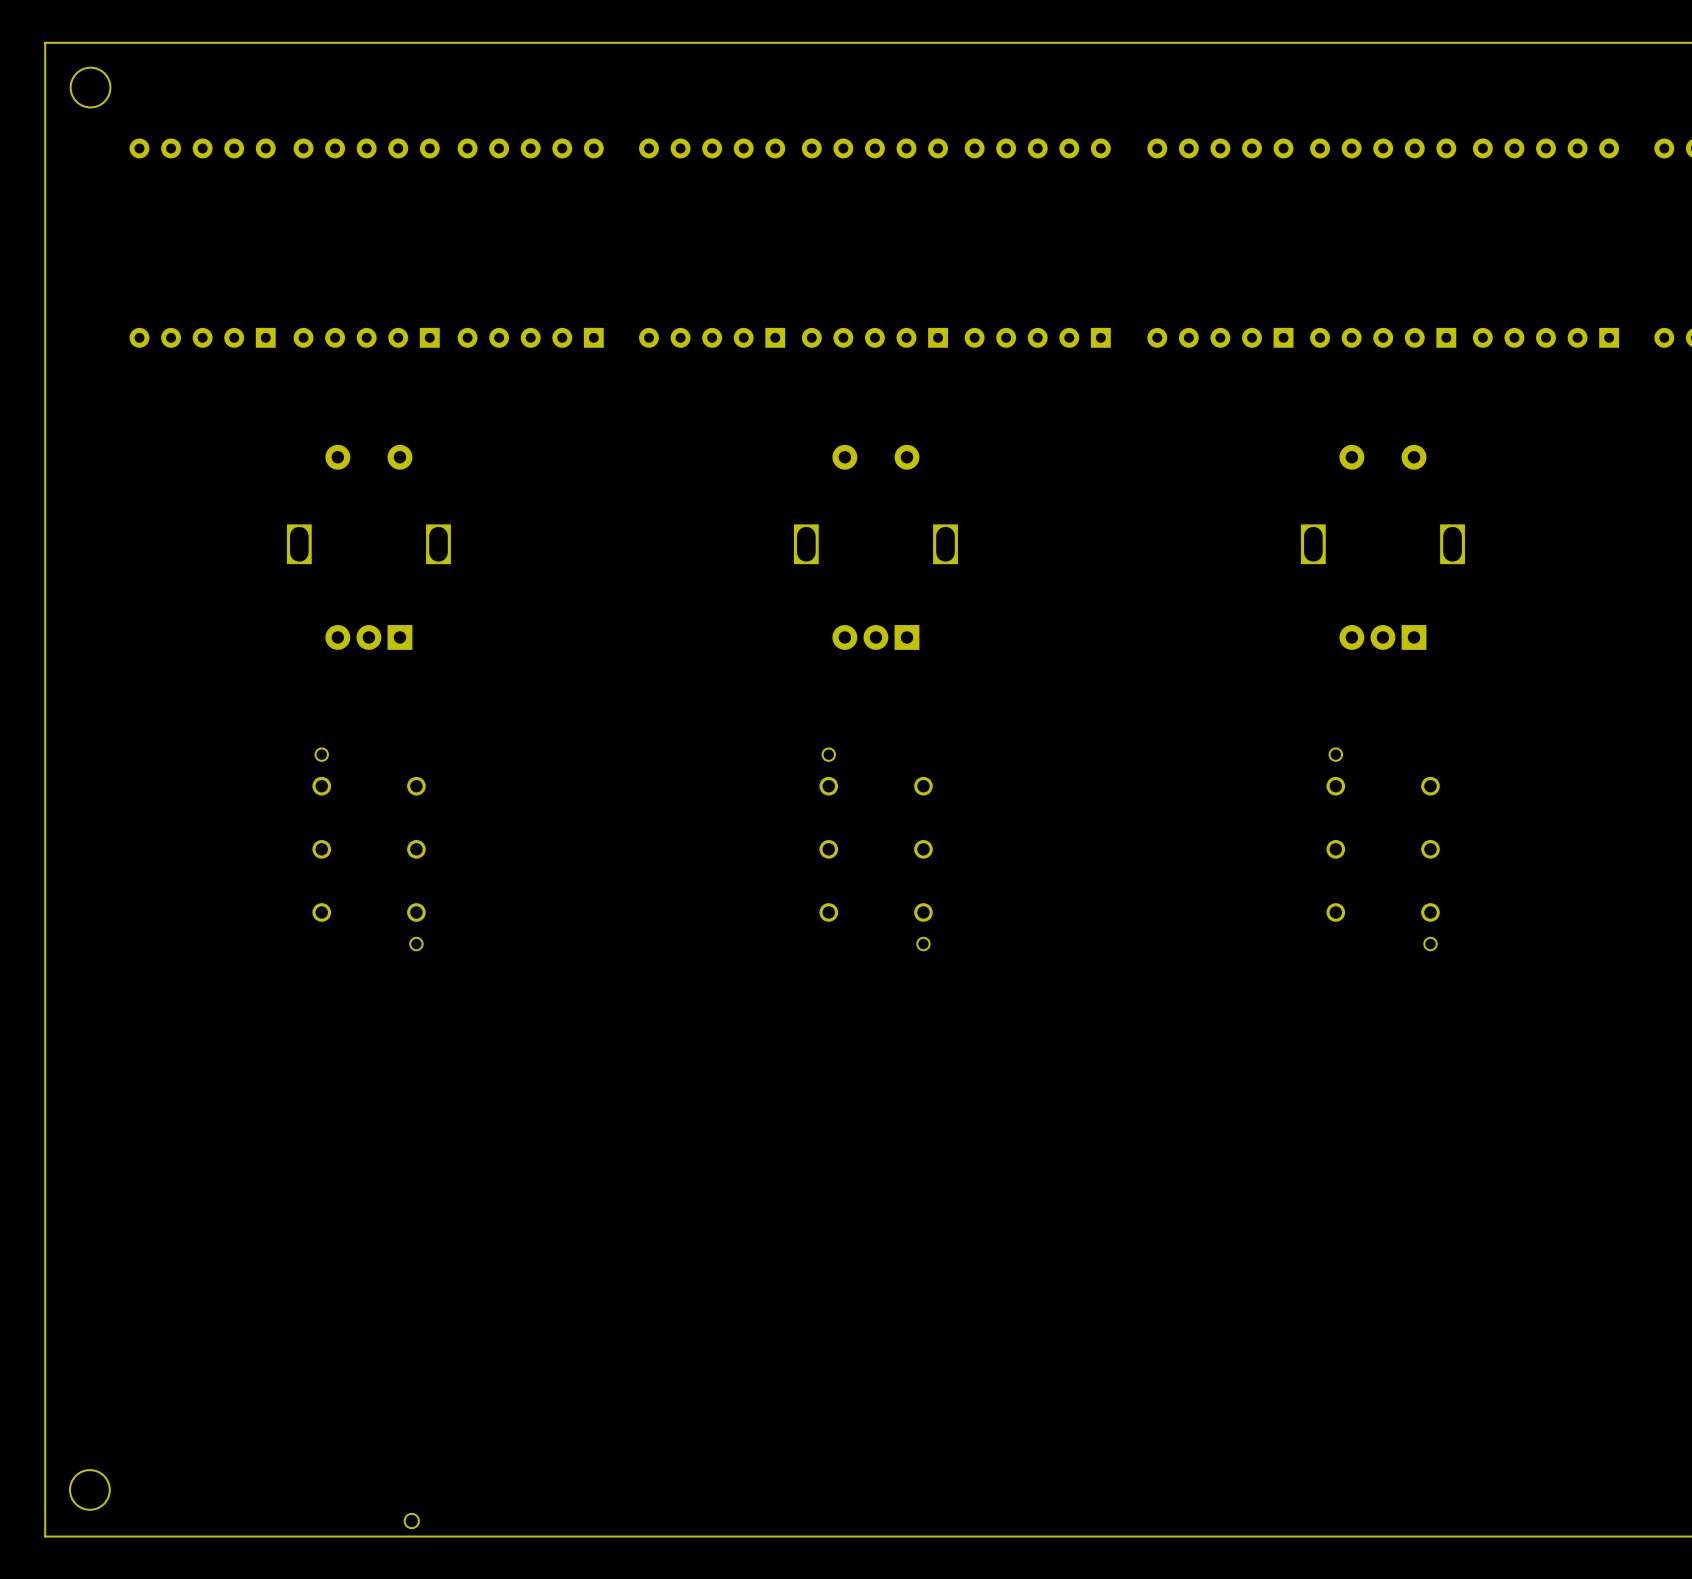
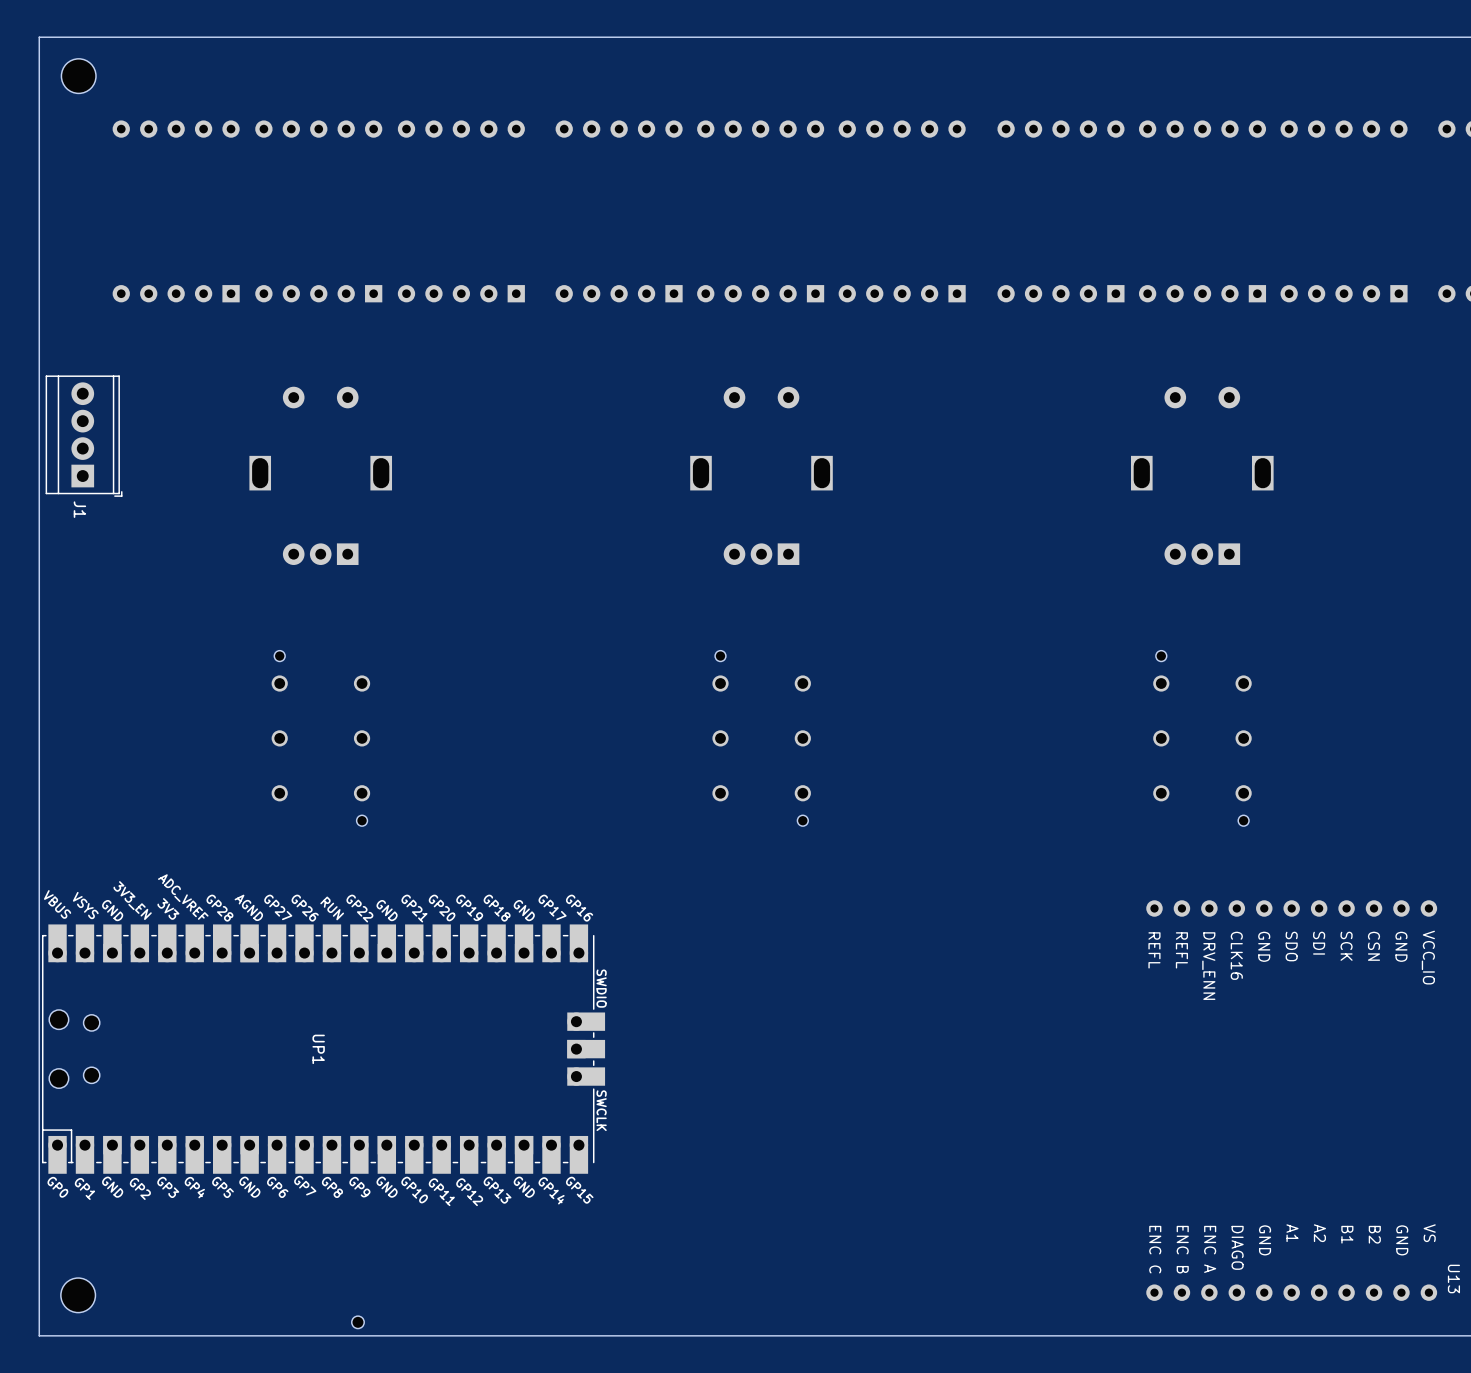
J1: none -> (84, 436)
UP1: none -> (323, 1049)
U13: none -> (1291, 1100)

